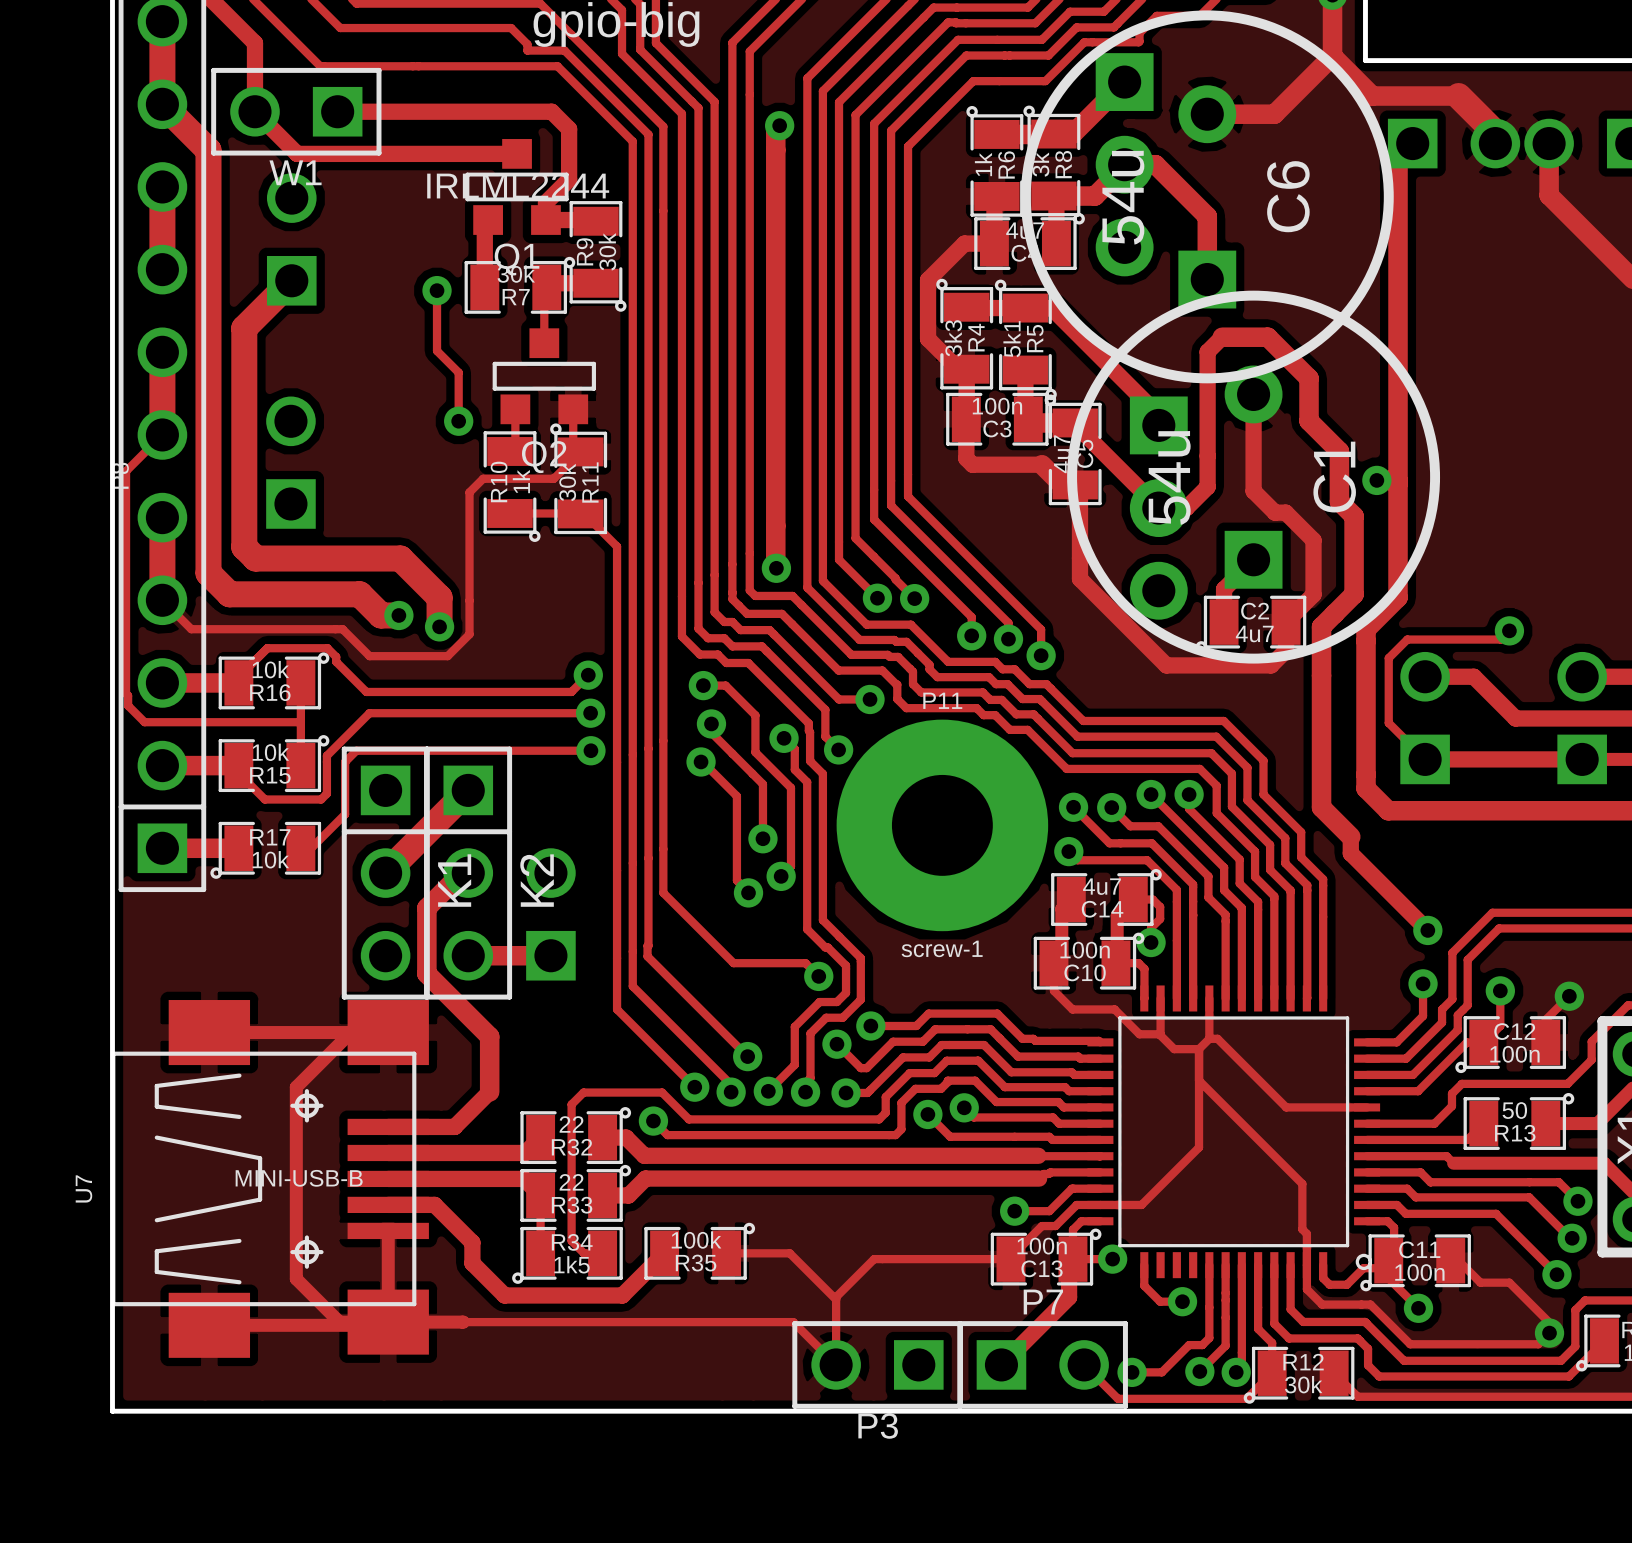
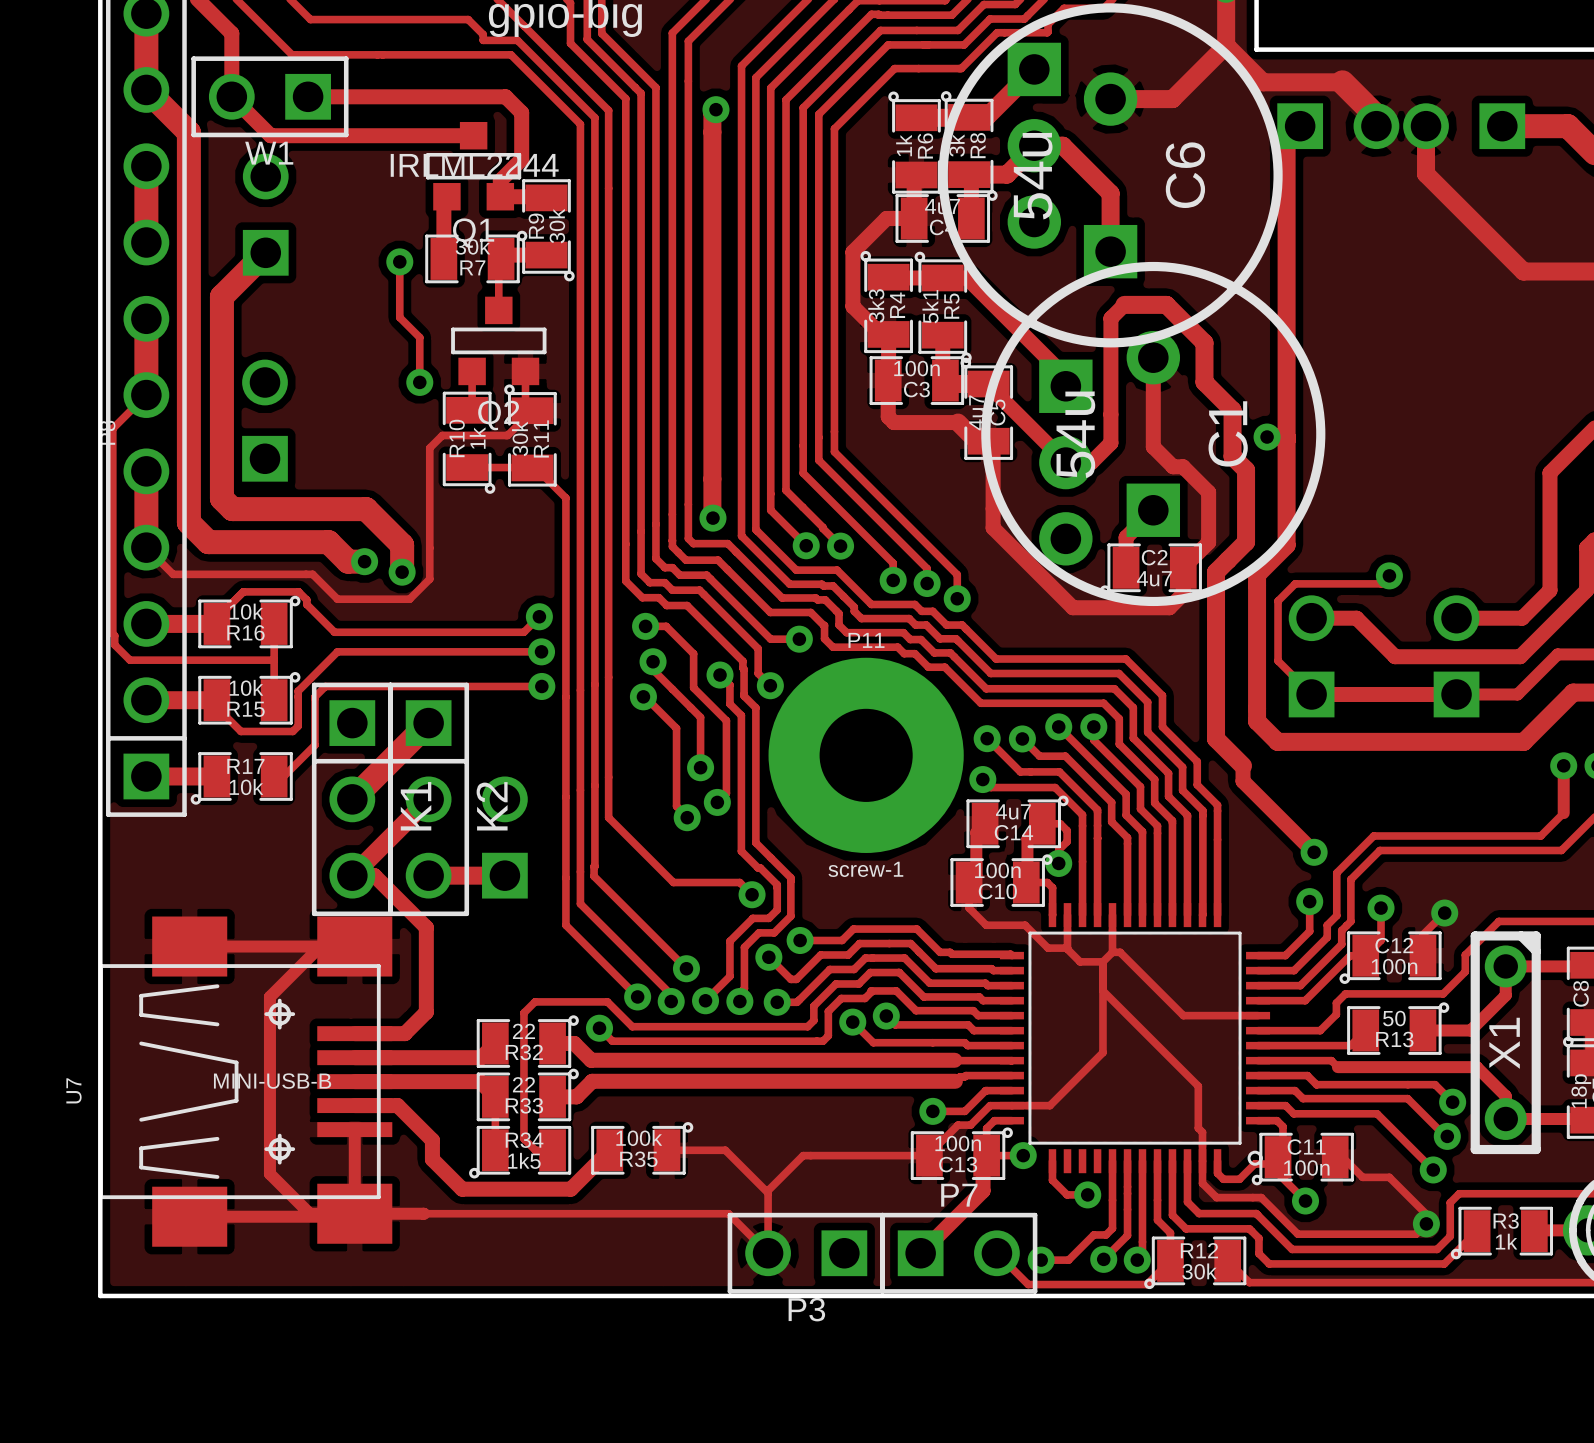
track: (468, 873) (461, 873) (426, 908) (426, 973) (489, 1036) (489, 1091) (454, 1126) (442, 1126) -> (428, 799) (352, 875) (374, 875) (426, 927) (426, 1012) (404, 1033)

